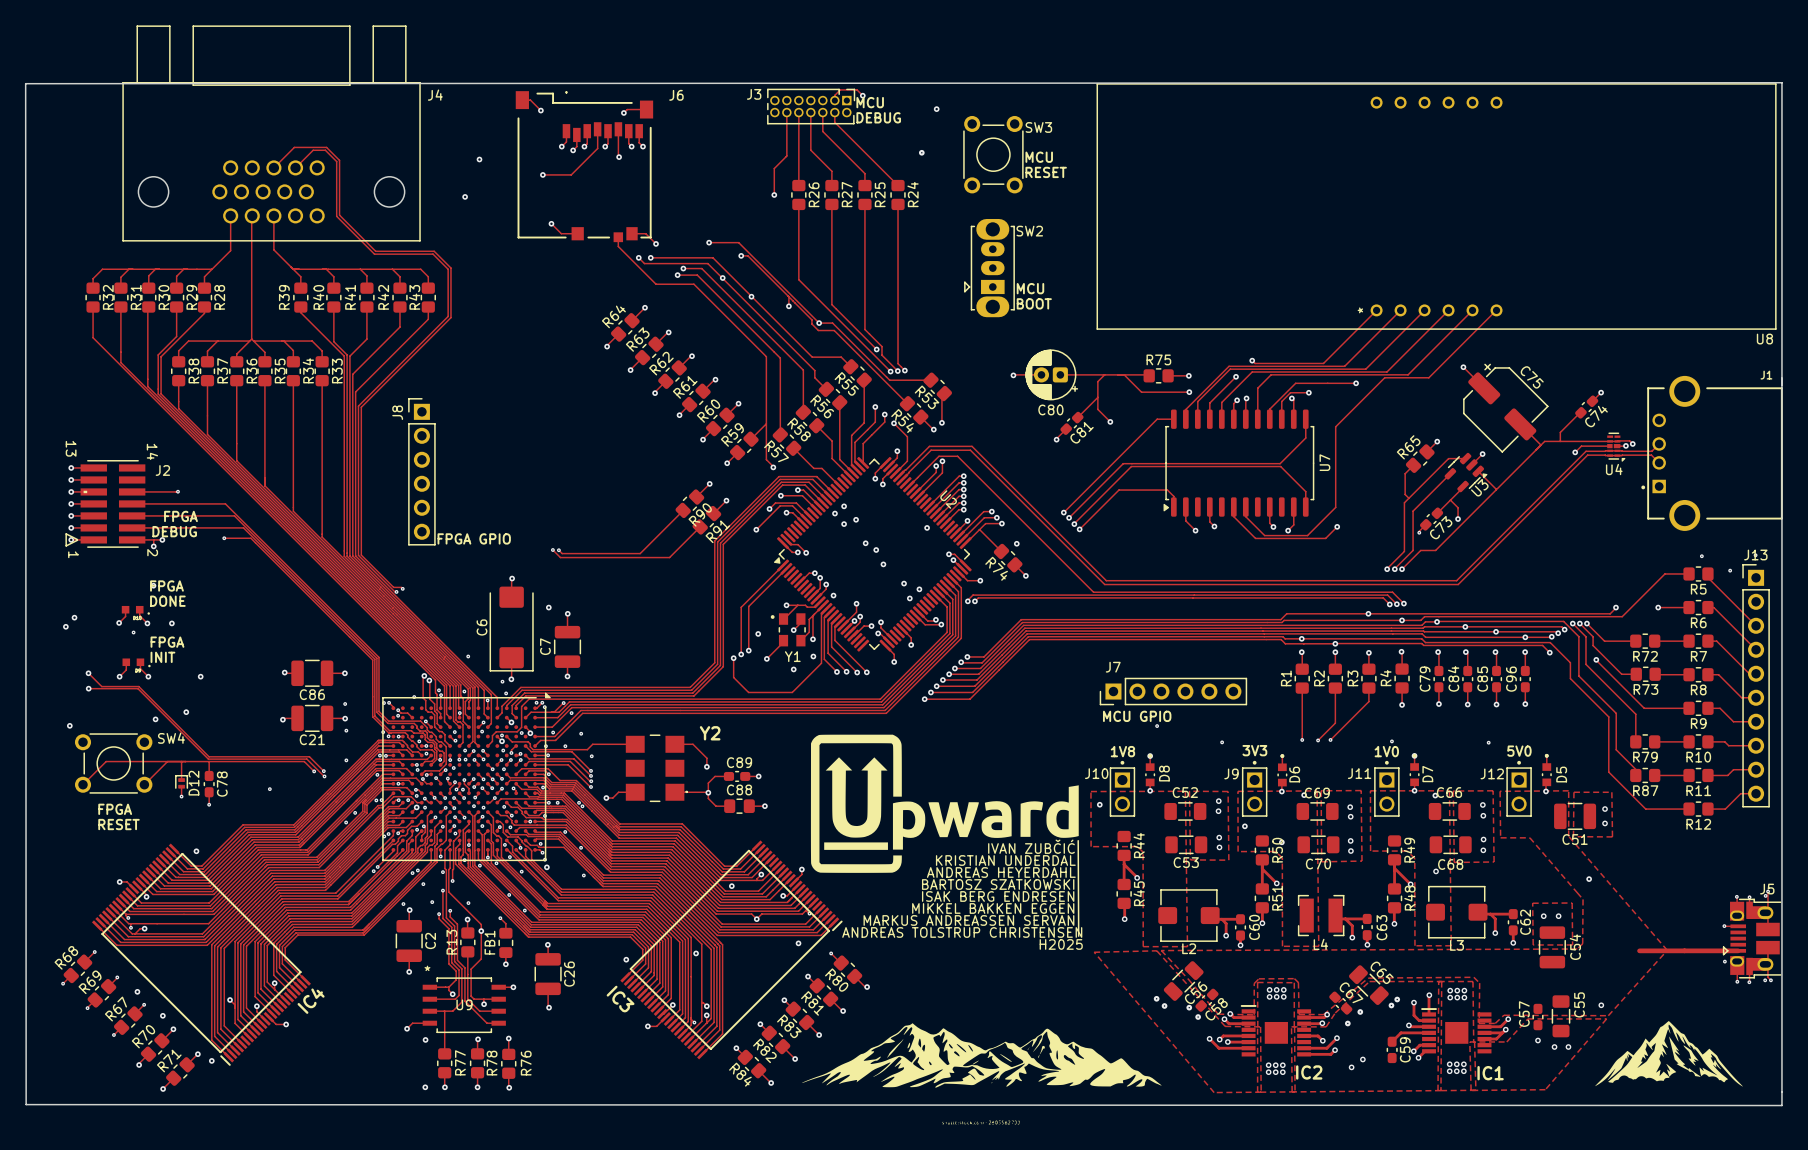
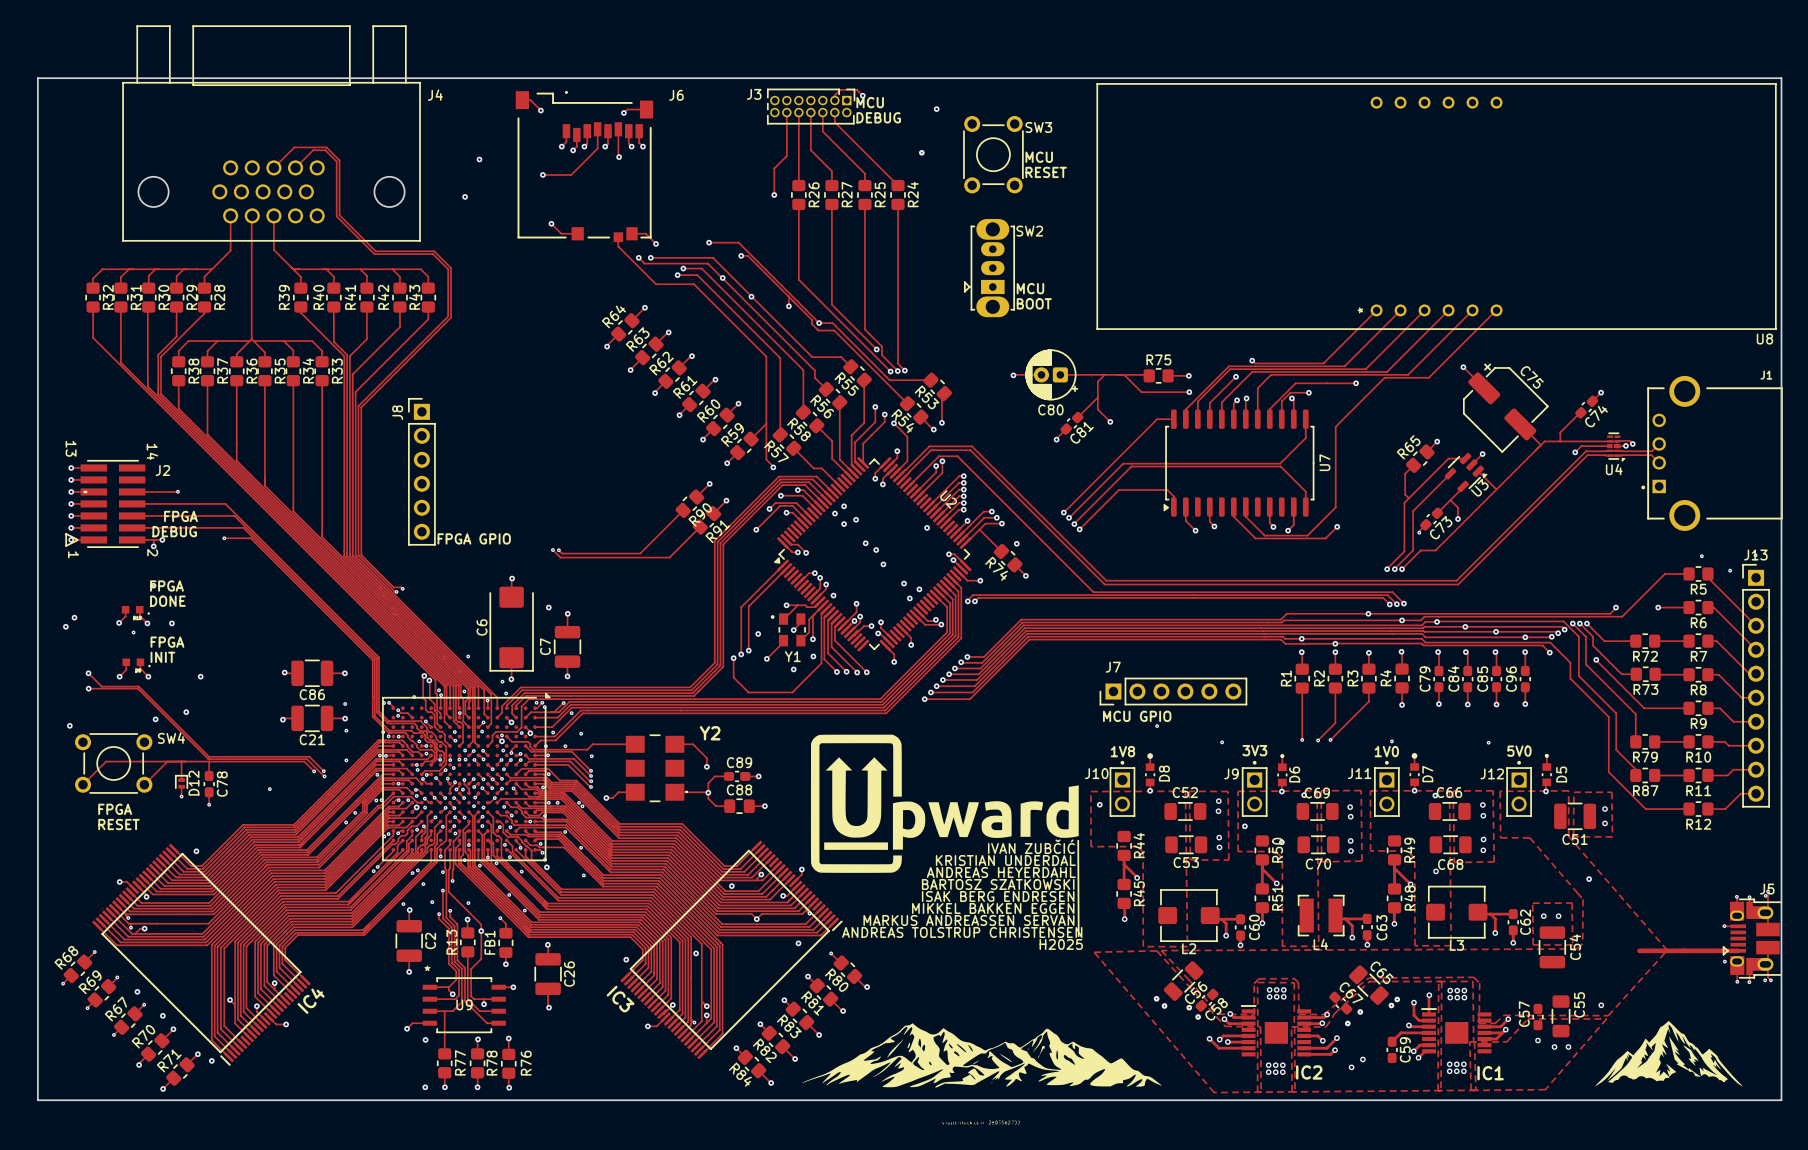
board edge: (1781, 82) (25, 83) (26, 1104) (1781, 1105) (1781, 82) -> (37, 78) (37, 1100) (1781, 1100) (1781, 78) (37, 78)

